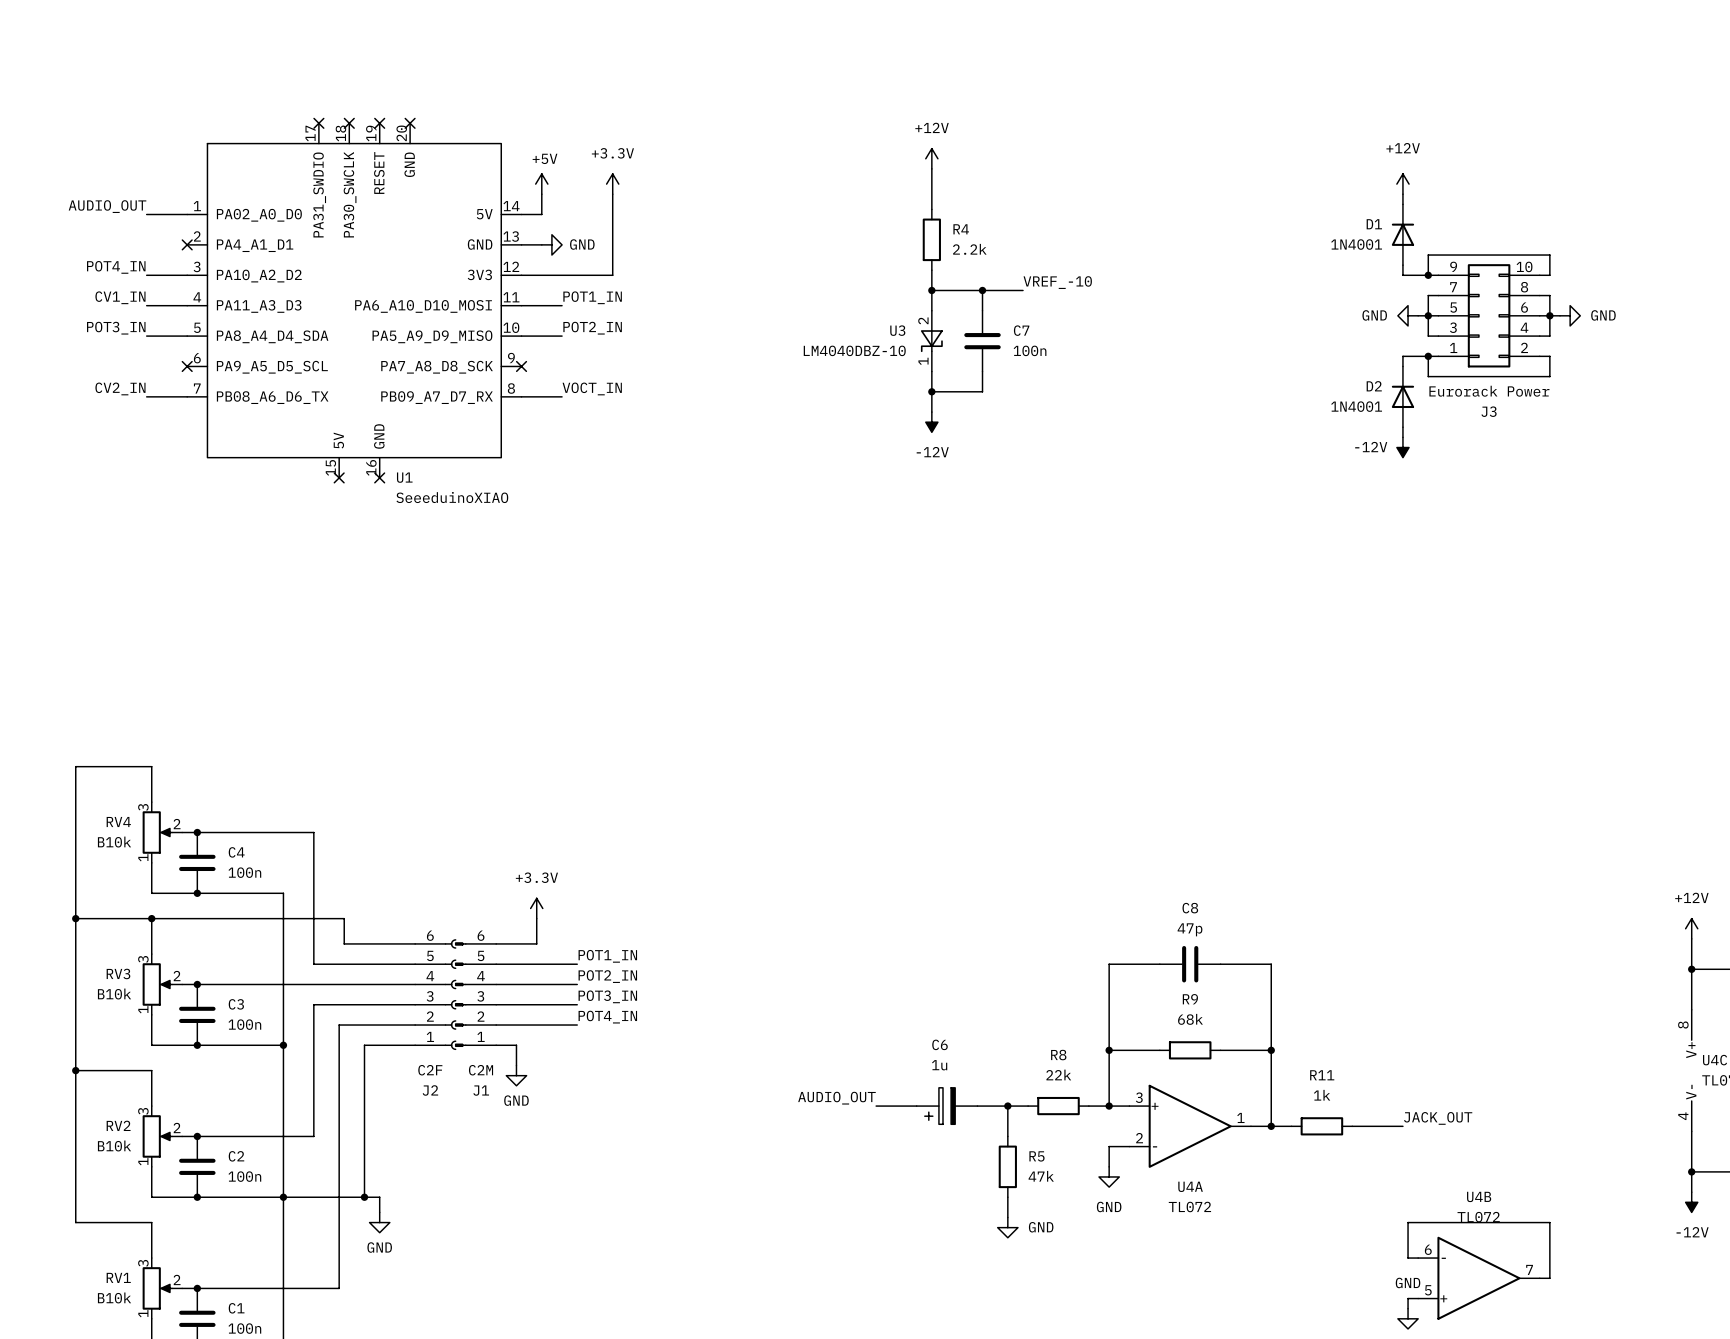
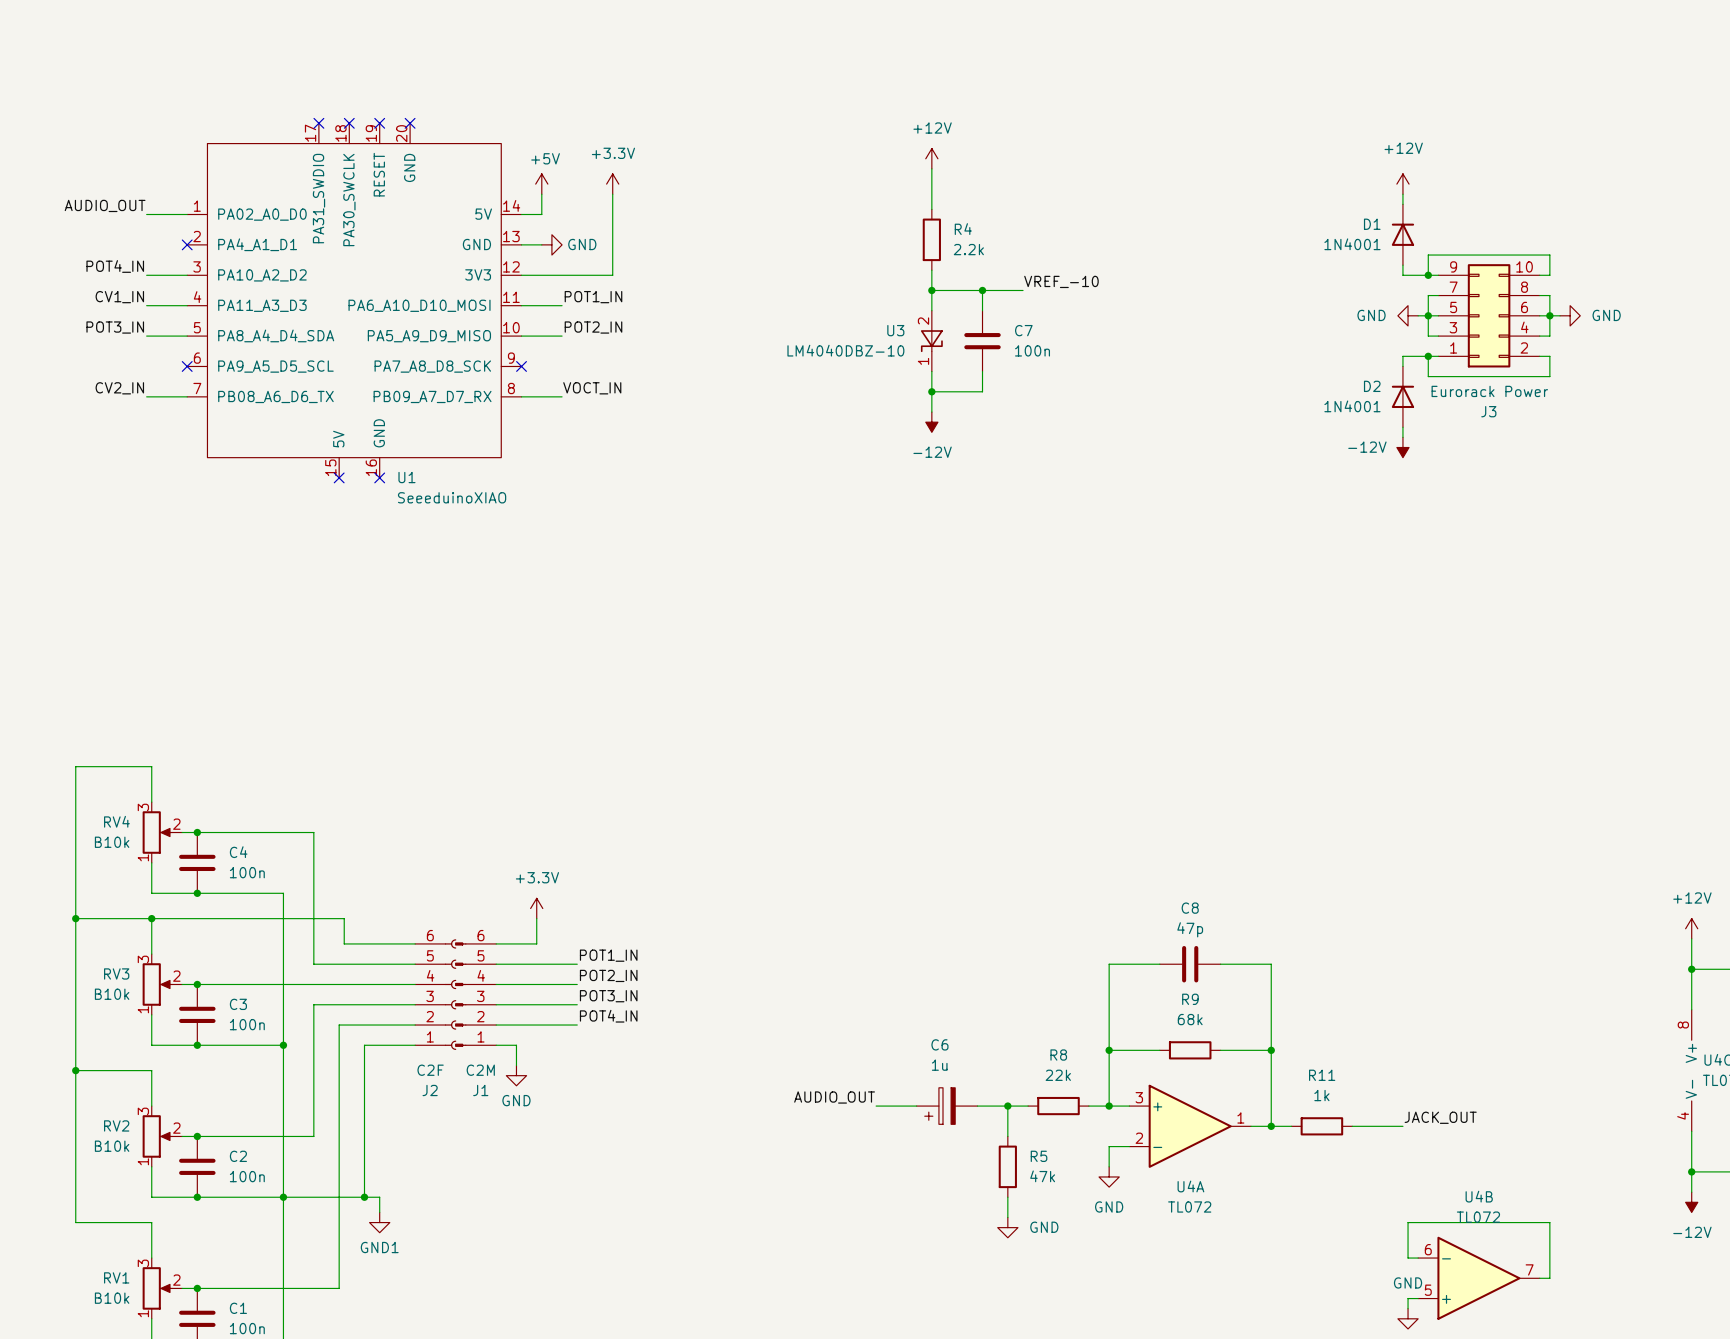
power symbol: GND (379, 1222) -> GND1 (379, 1222)

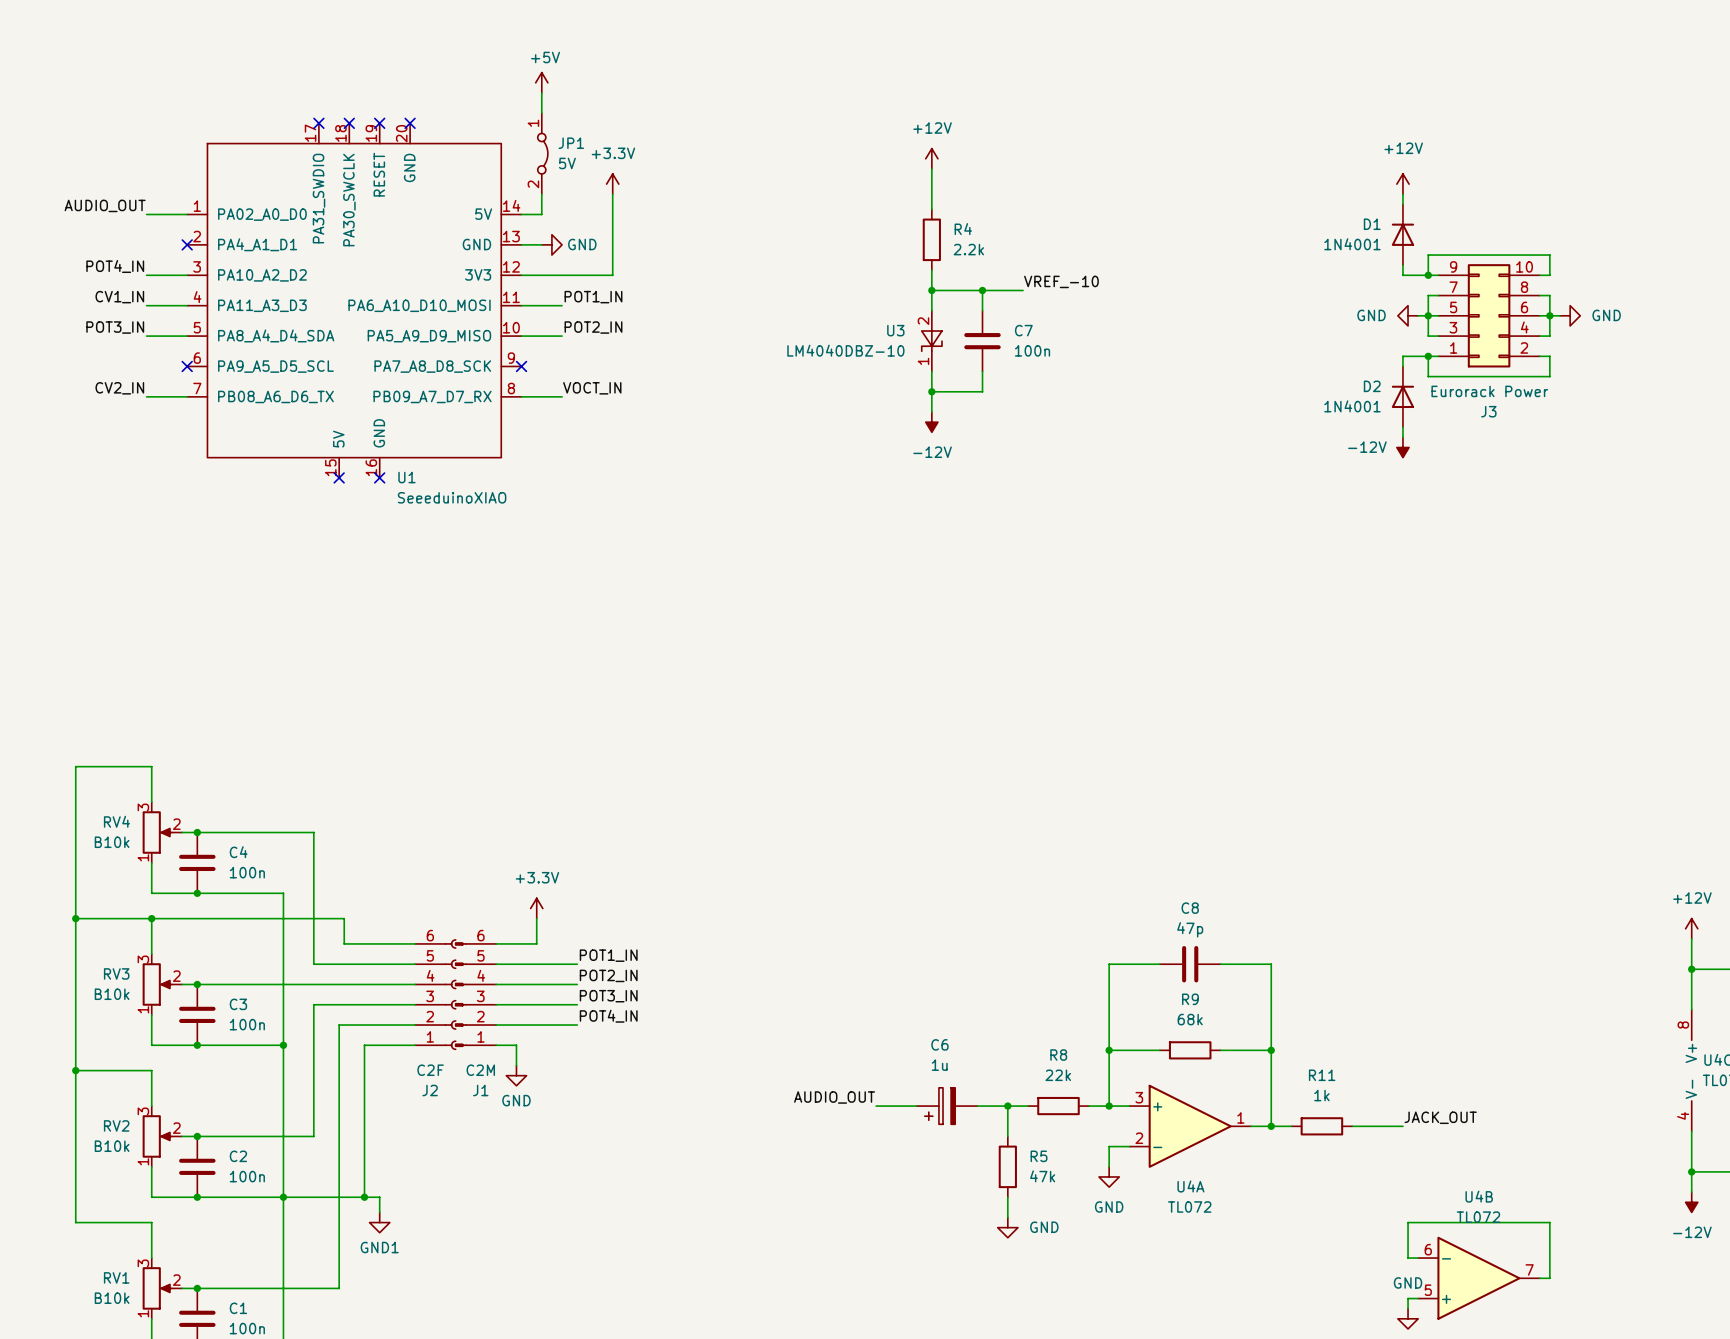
wire: none -> (541, 92) (541, 113)
JP1: none -> 5V (542, 153)
power symbol position: +5V (541, 184) -> +5V (541, 82)

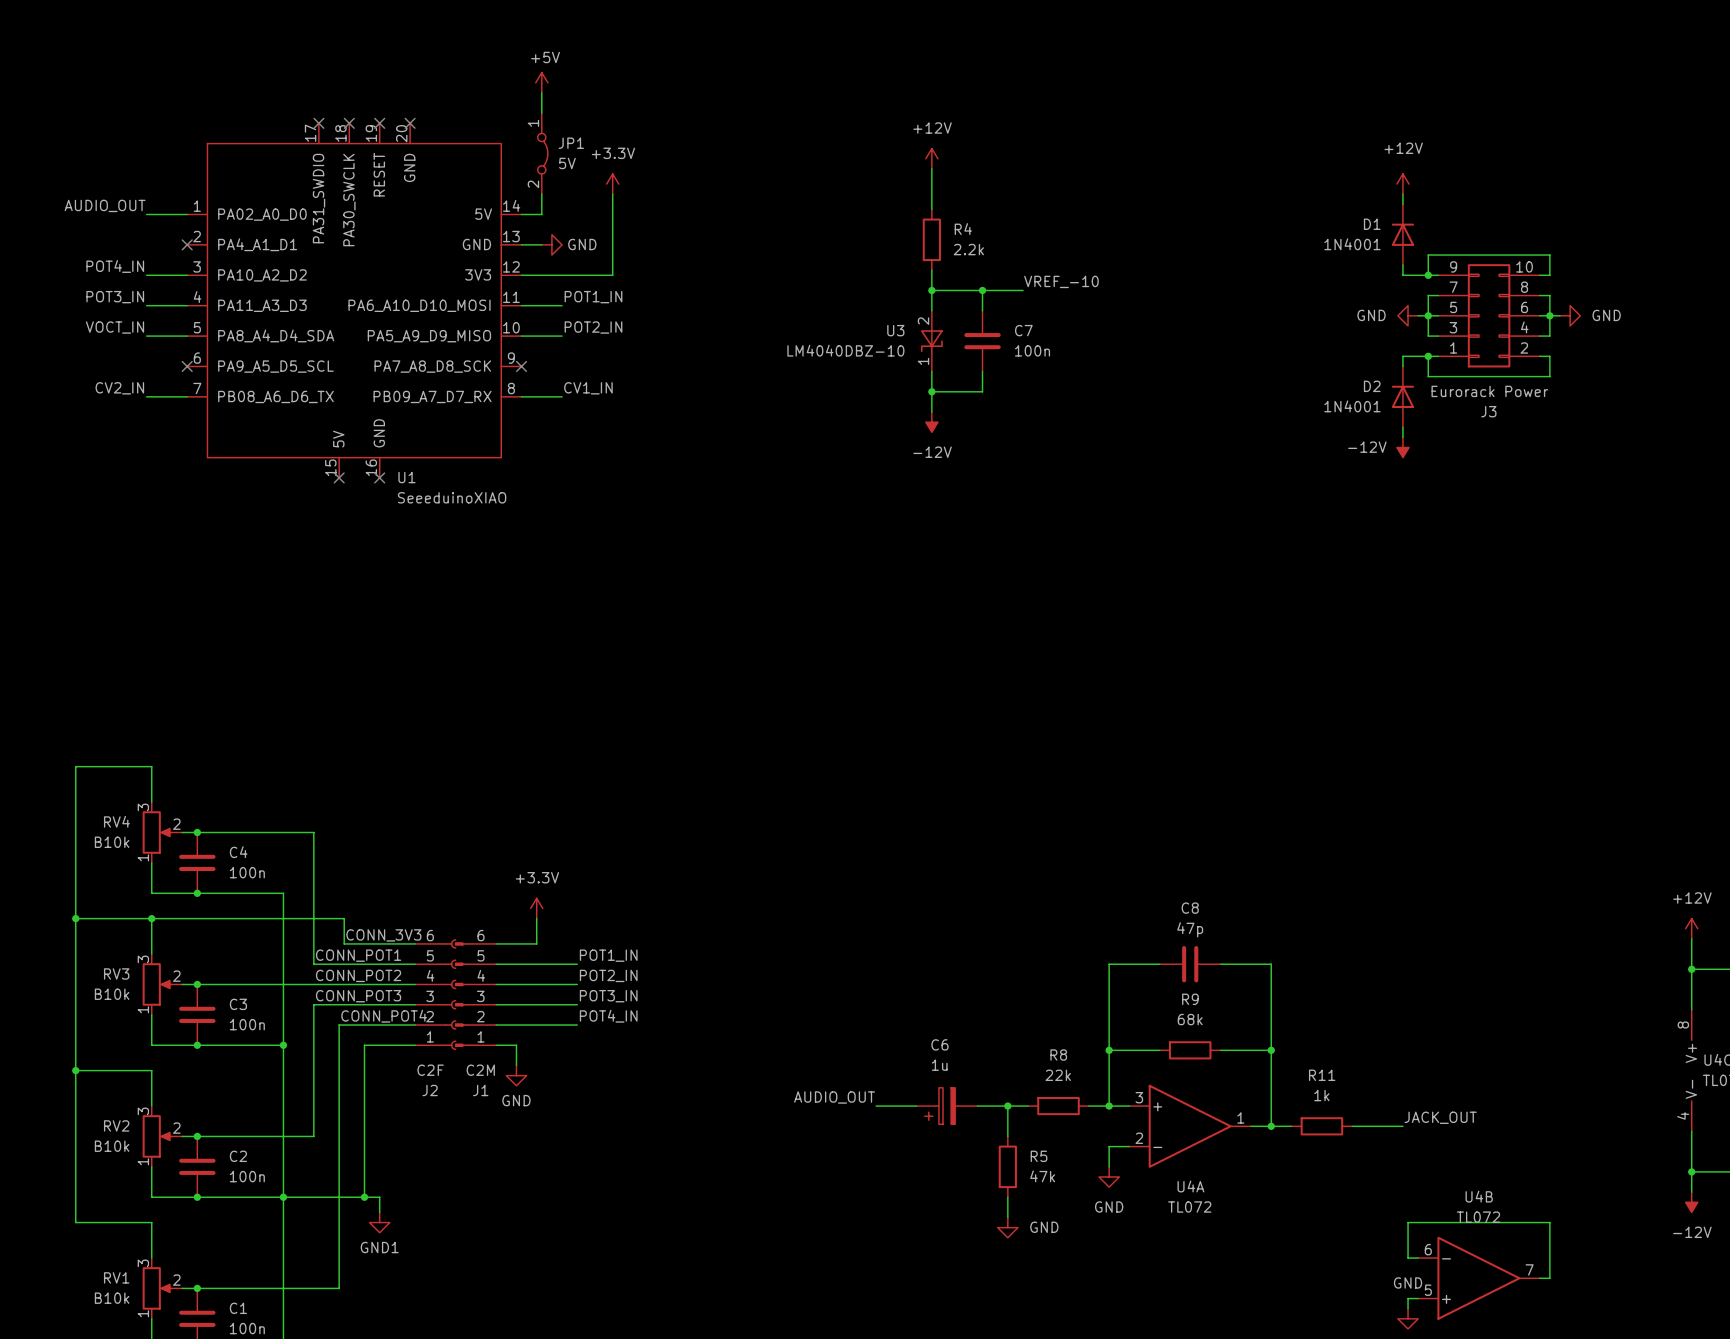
label: CV1_IN (119, 297) -> POT3_IN (115, 297)
label: POT3_IN (115, 327) -> VOCT_IN (114, 327)
label: VOCT_IN (592, 388) -> CV1_IN (588, 388)
label: none -> CONN_3V3 (383, 935)
label: none -> CONN_POT1 (358, 955)
label: none -> CONN_POT2 (358, 975)
label: none -> CONN_POT3 (358, 996)
label: none -> CONN_POT4 (384, 1016)

